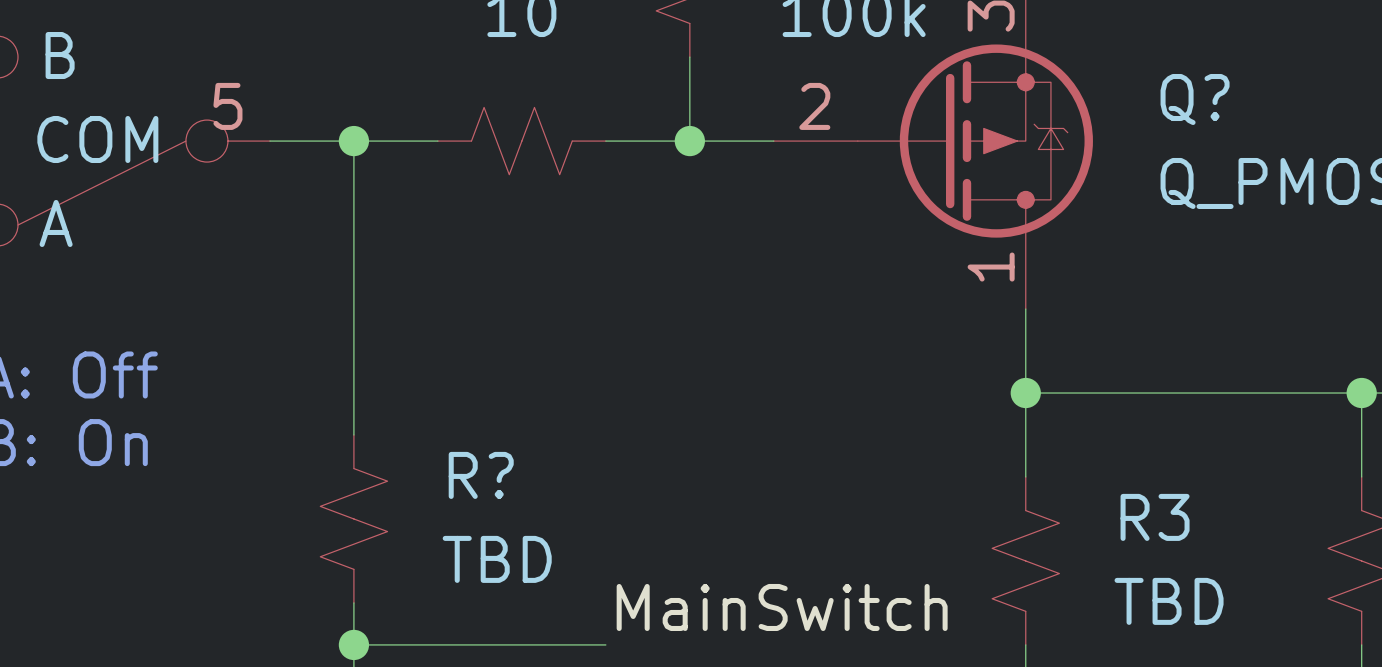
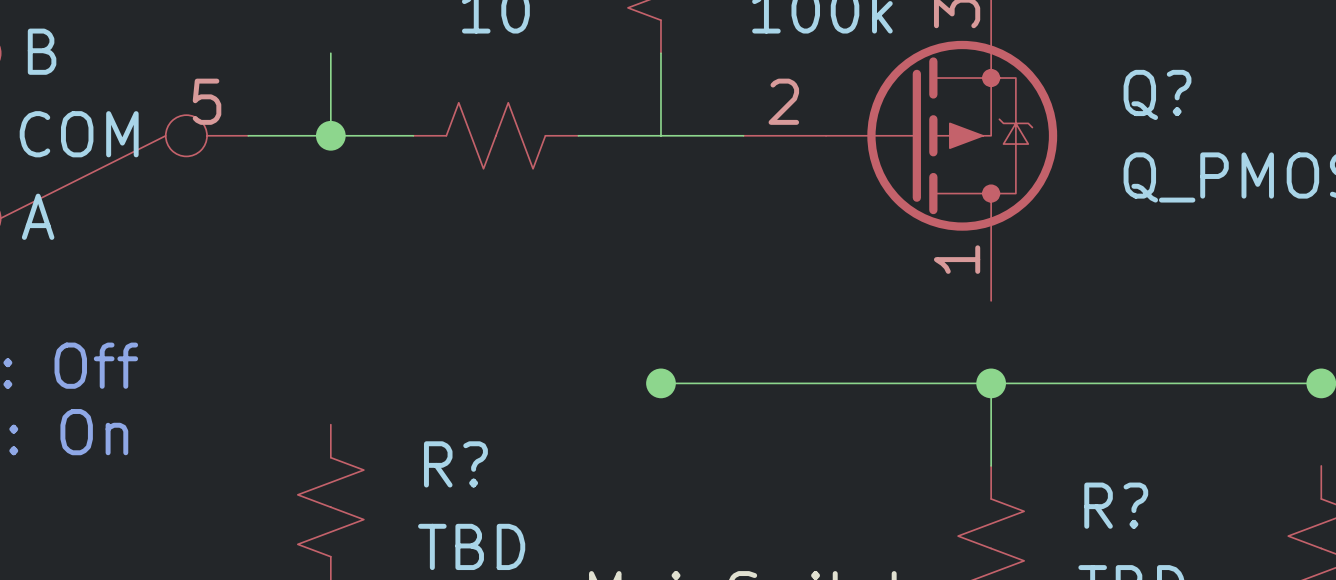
wire: (353, 141) (353, 434) -> (330, 135) (330, 53)
junction: (689, 141) -> none
wire: (1025, 309) (1025, 393) -> (660, 383) (991, 383)
junction: none -> (660, 383)
wire: (1361, 393) (1361, 476) -> none
R3 name: R3 (1155, 517) -> R? (1116, 505)

